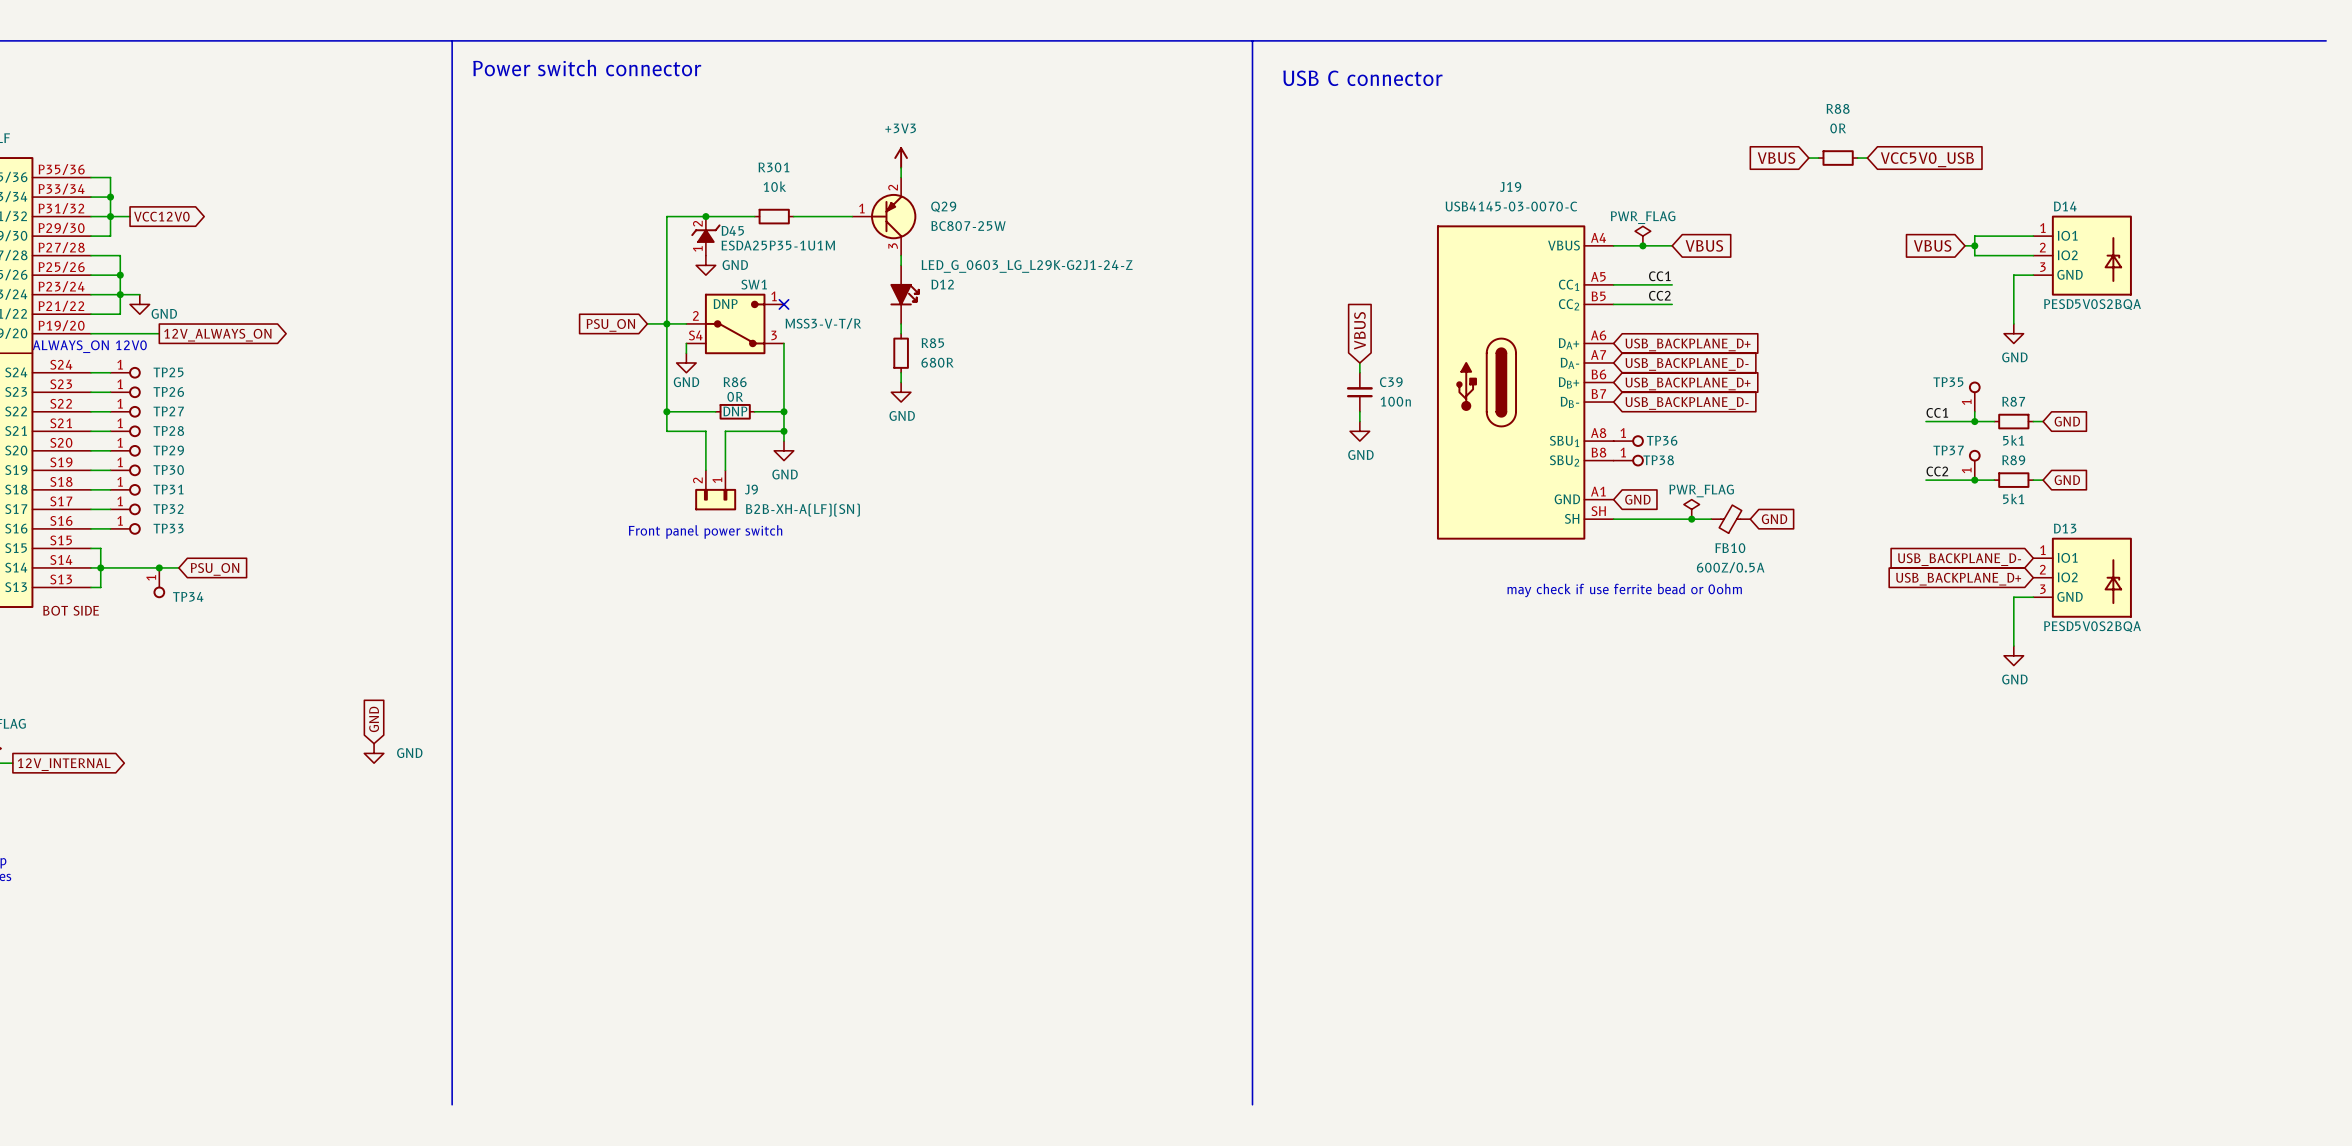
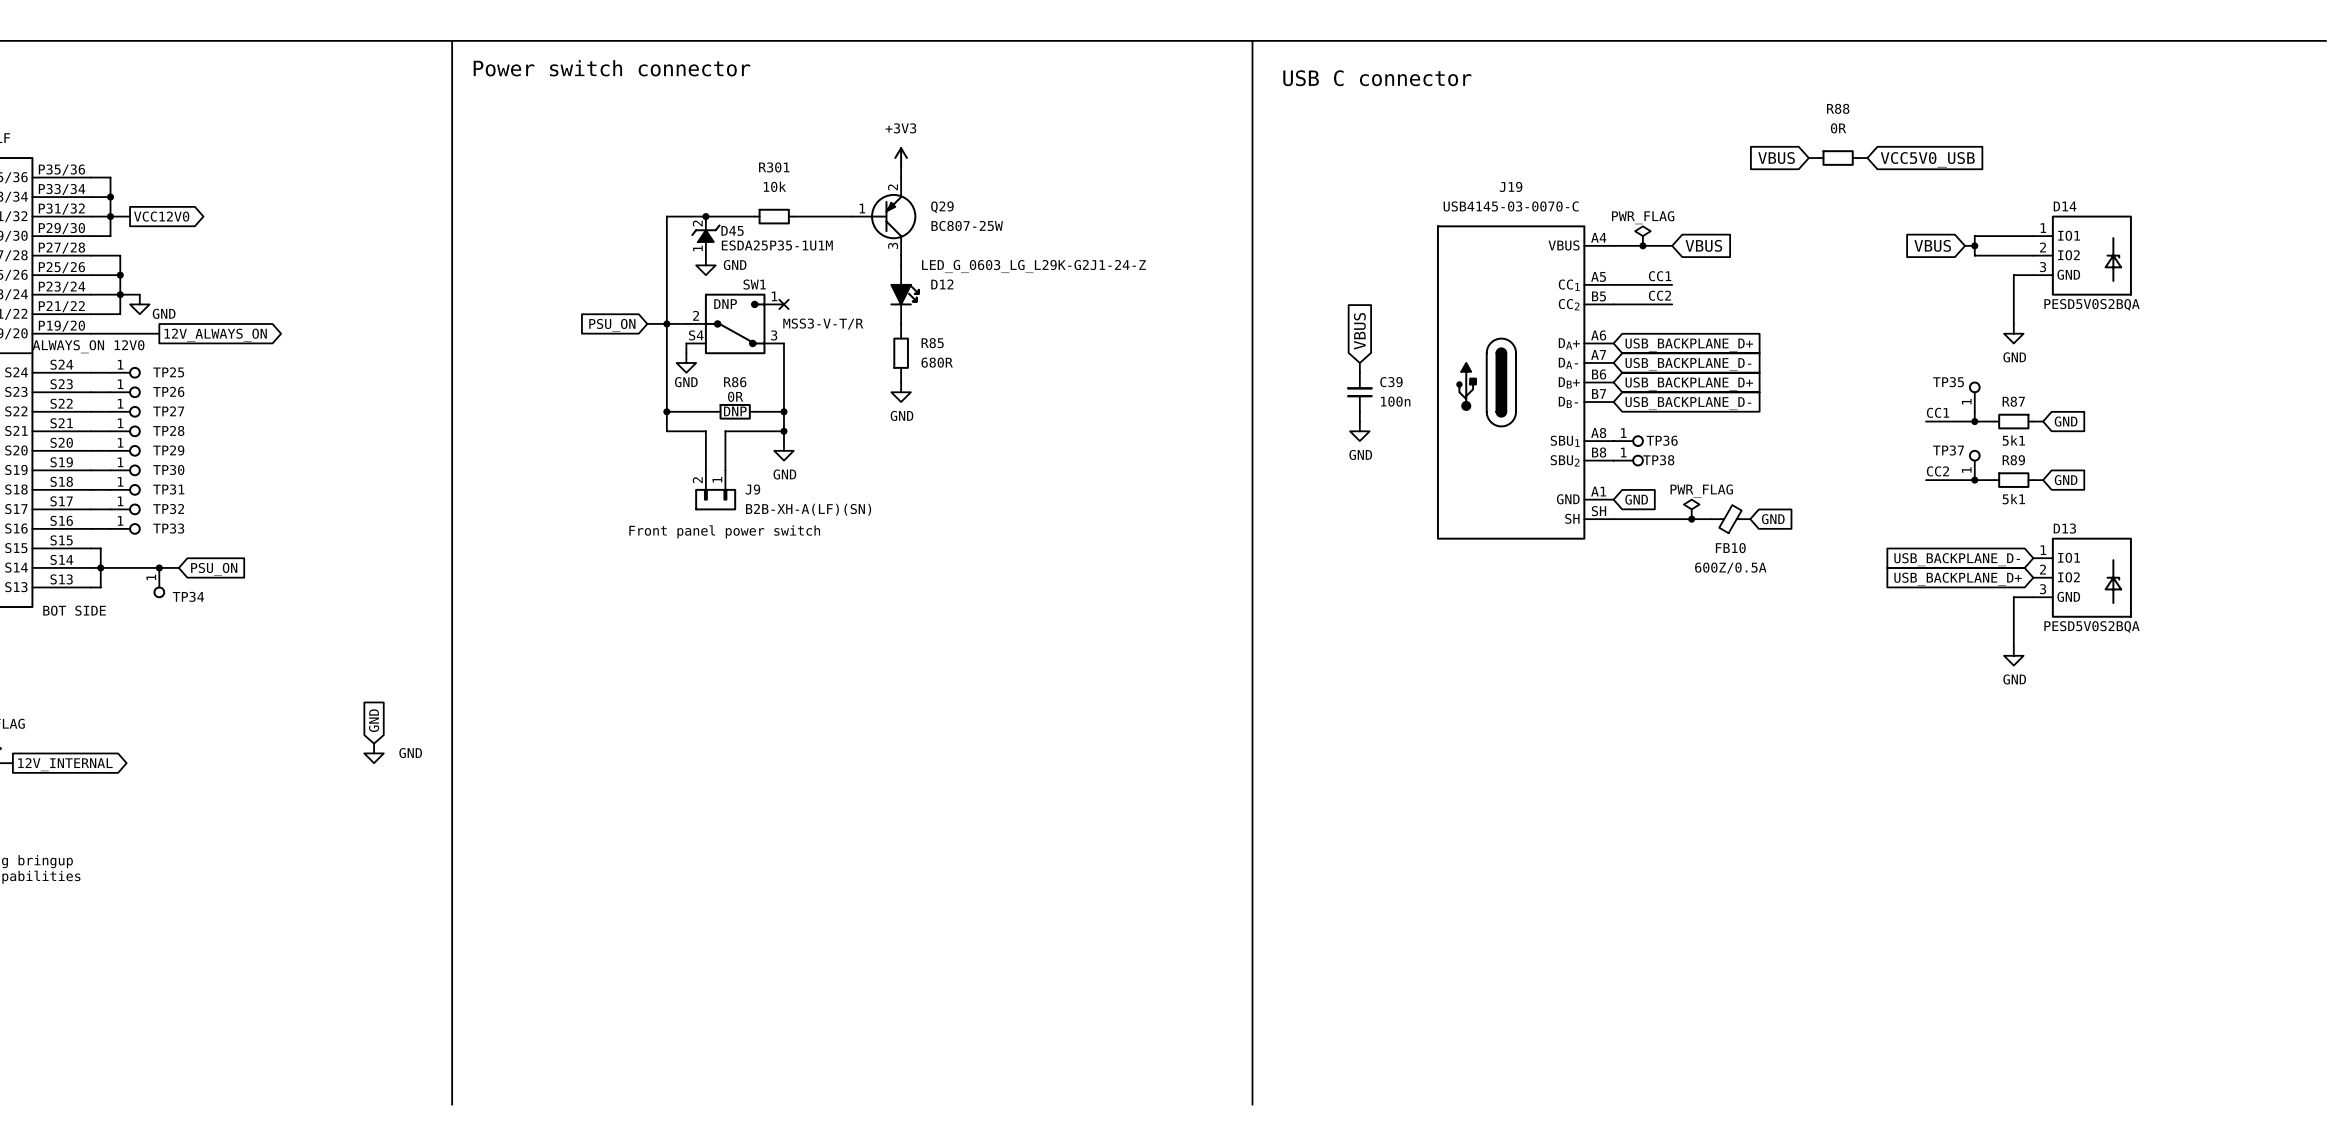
text: may check if use ferrite bead or 0ohm (1624, 590) -> none

